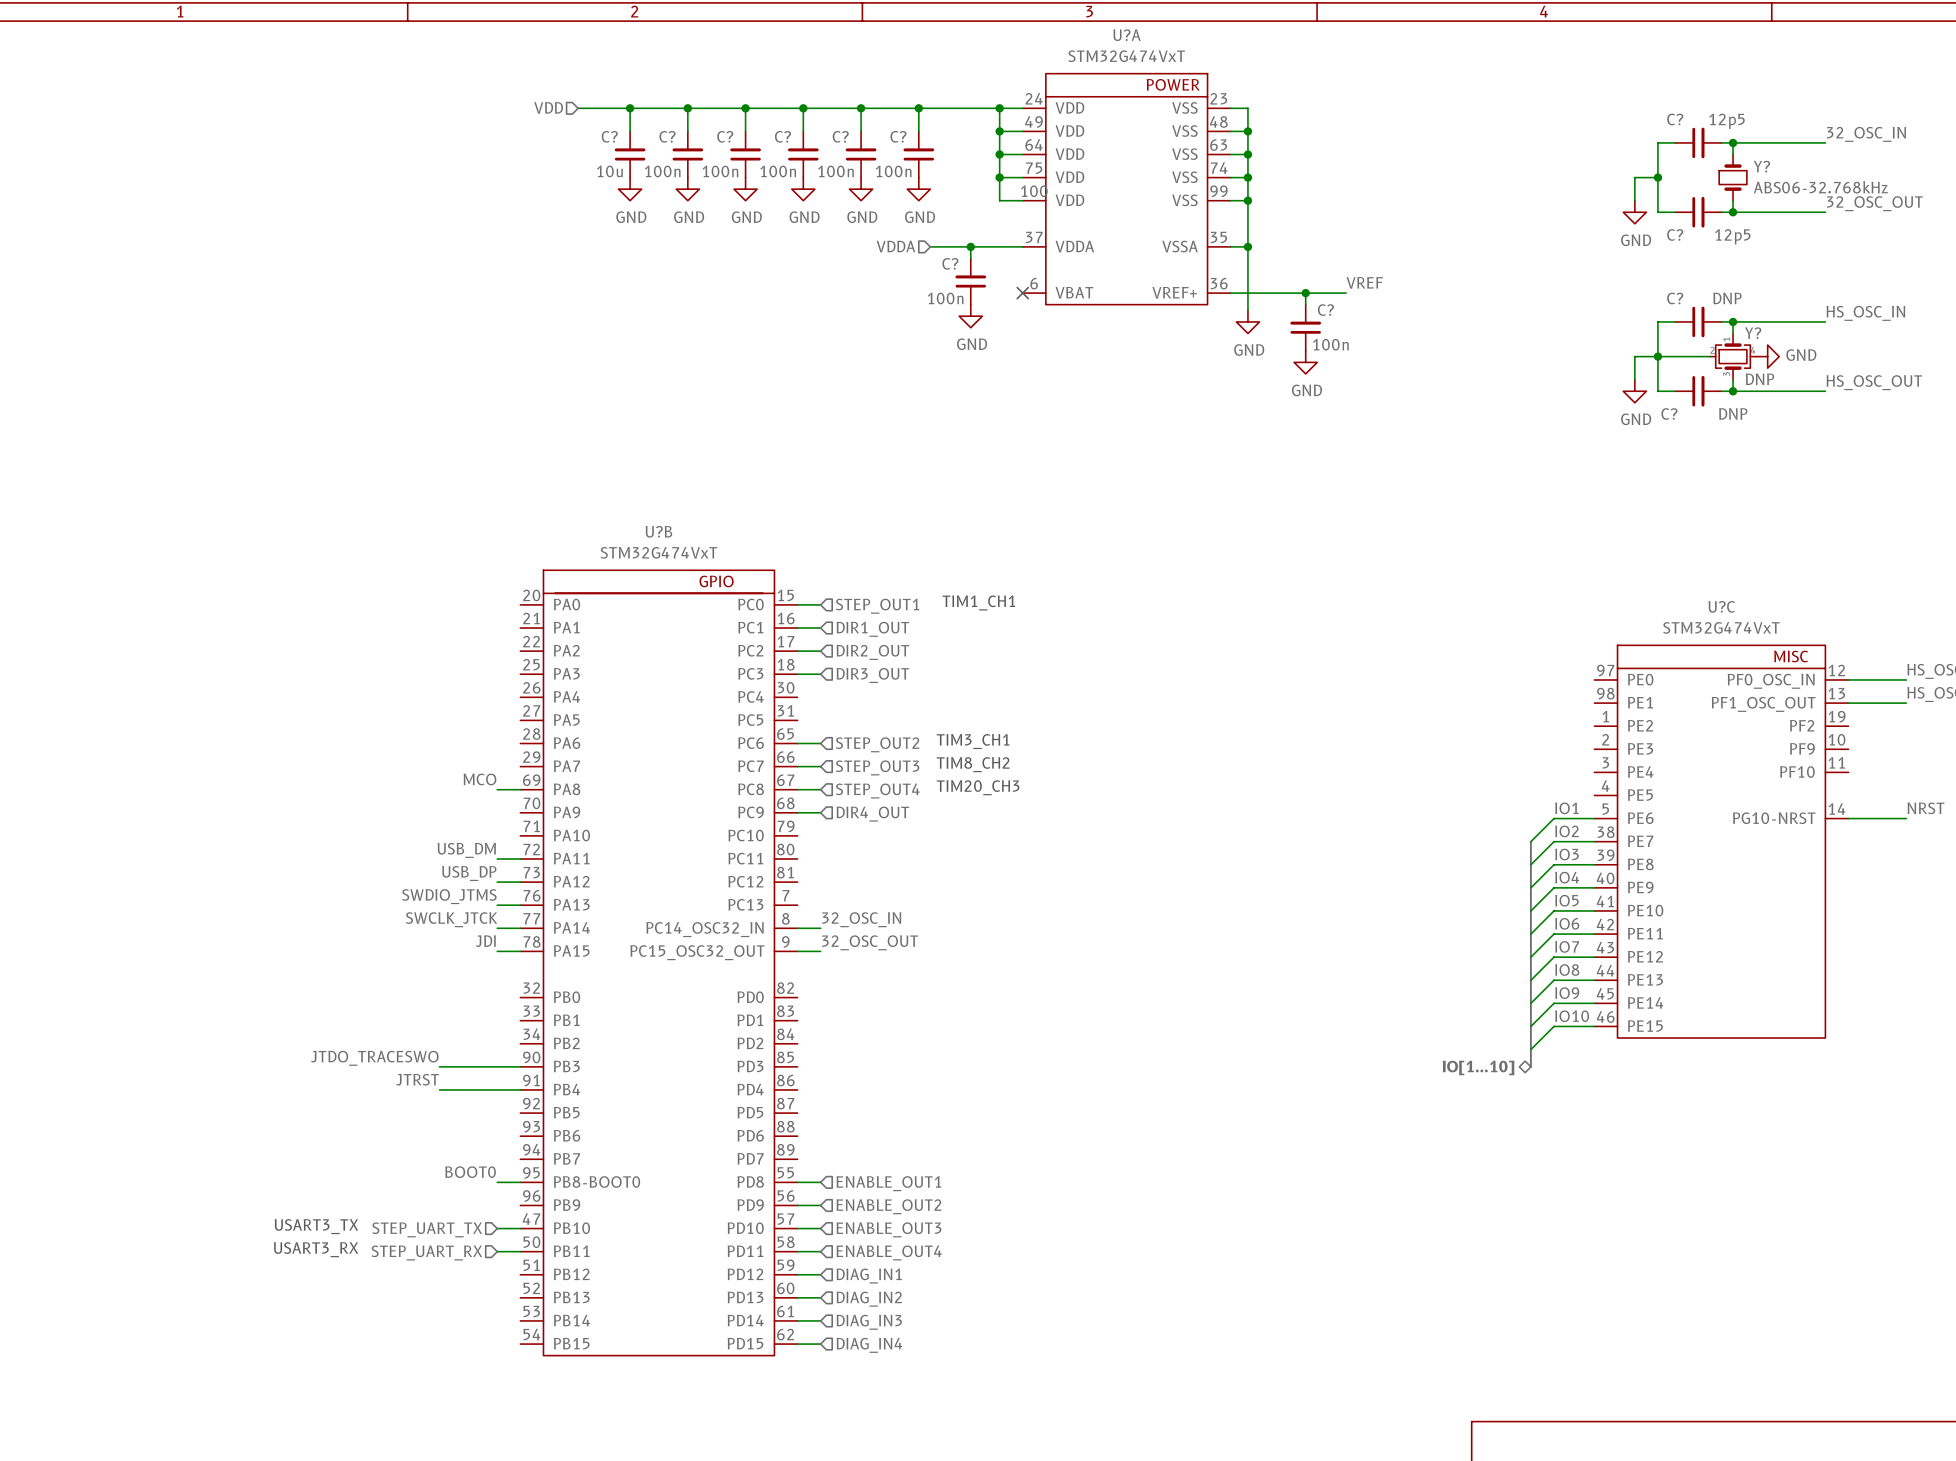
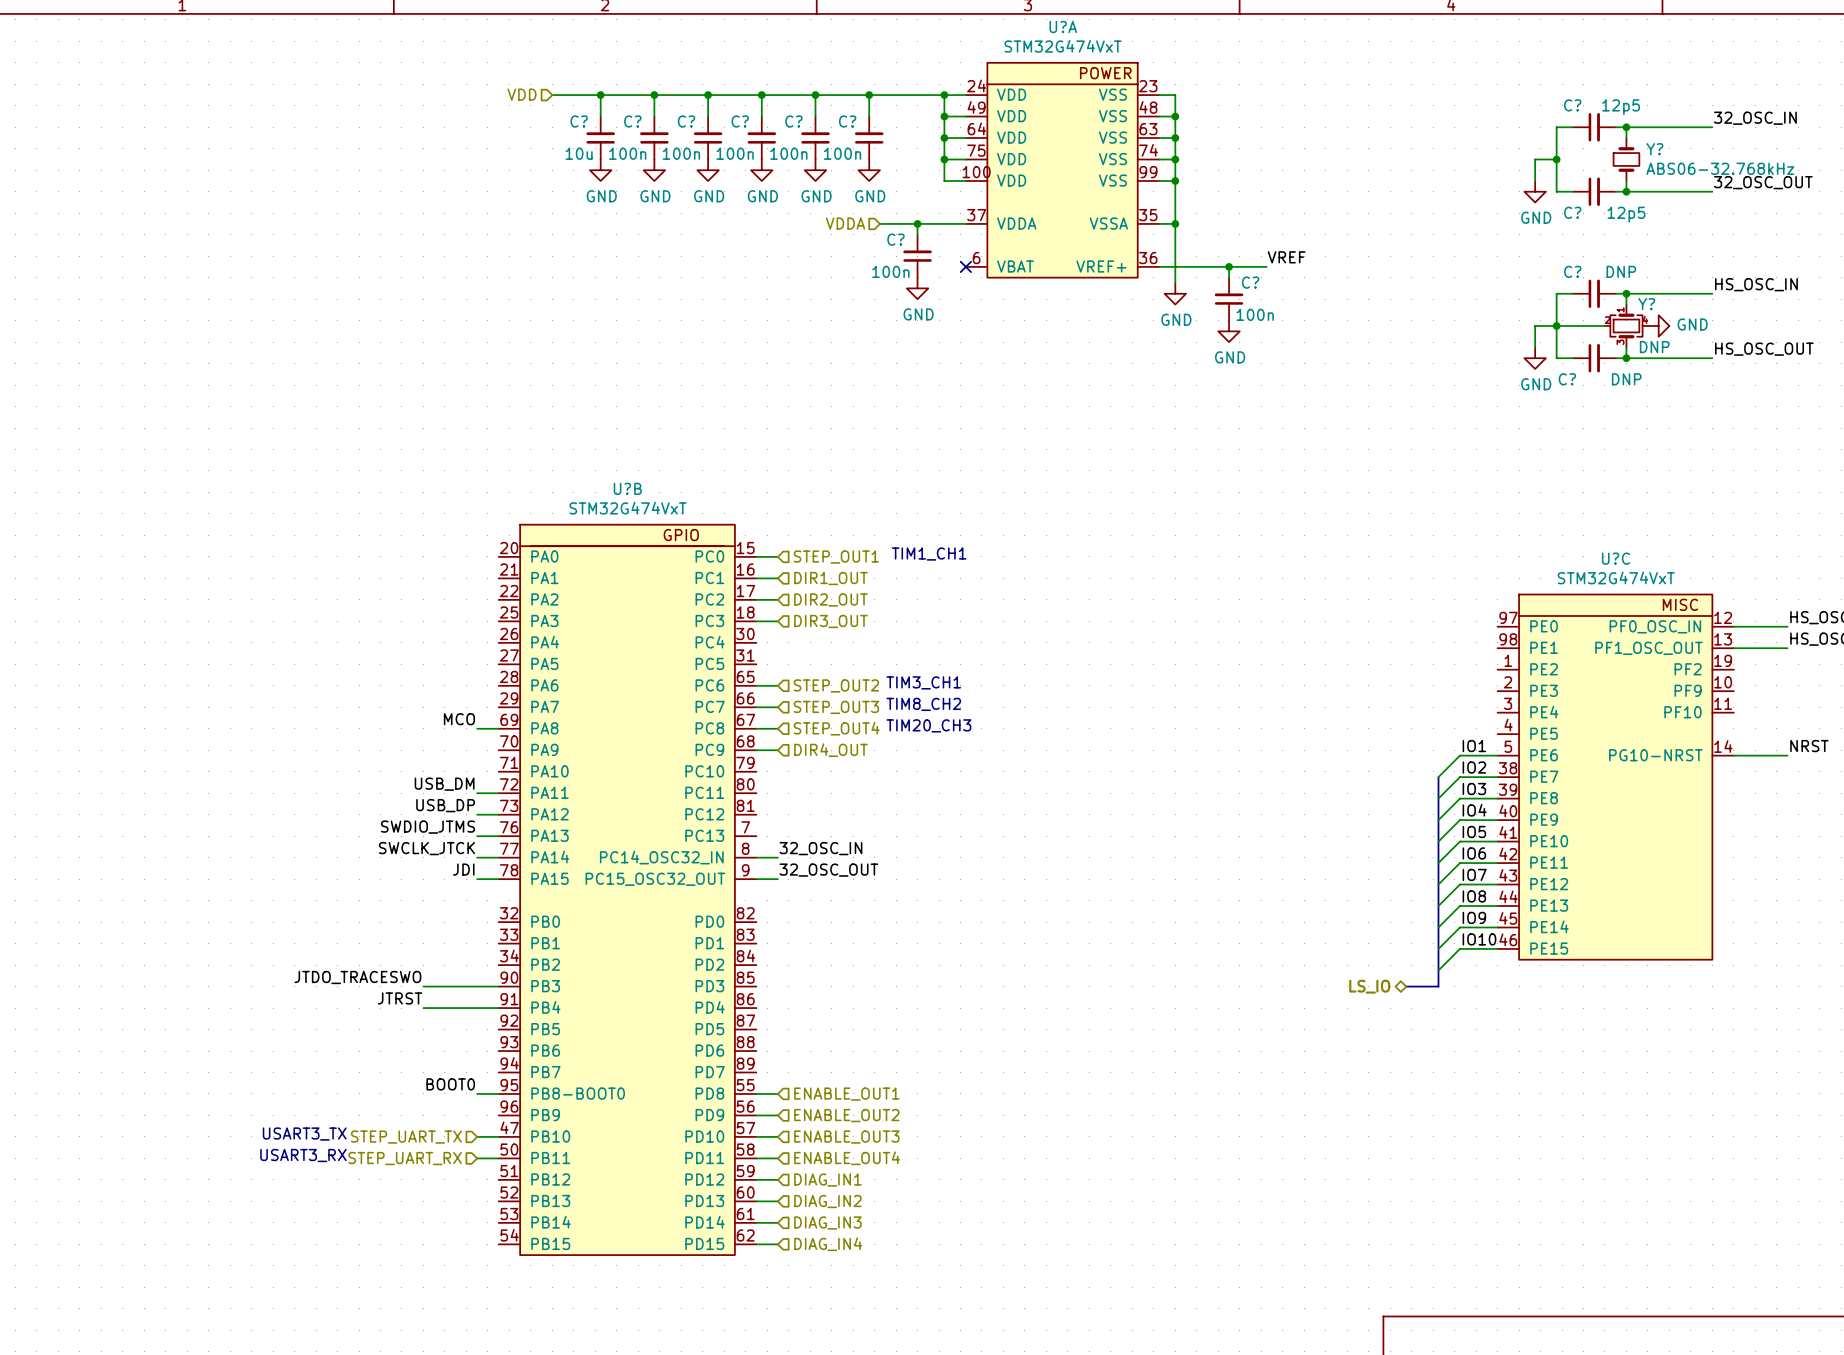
bus: none -> (1406, 986) (1438, 986)
hierarchical label: IO[1...10] (1478, 1067) -> none
hierarchical label: none -> LS_IO (1369, 986)

